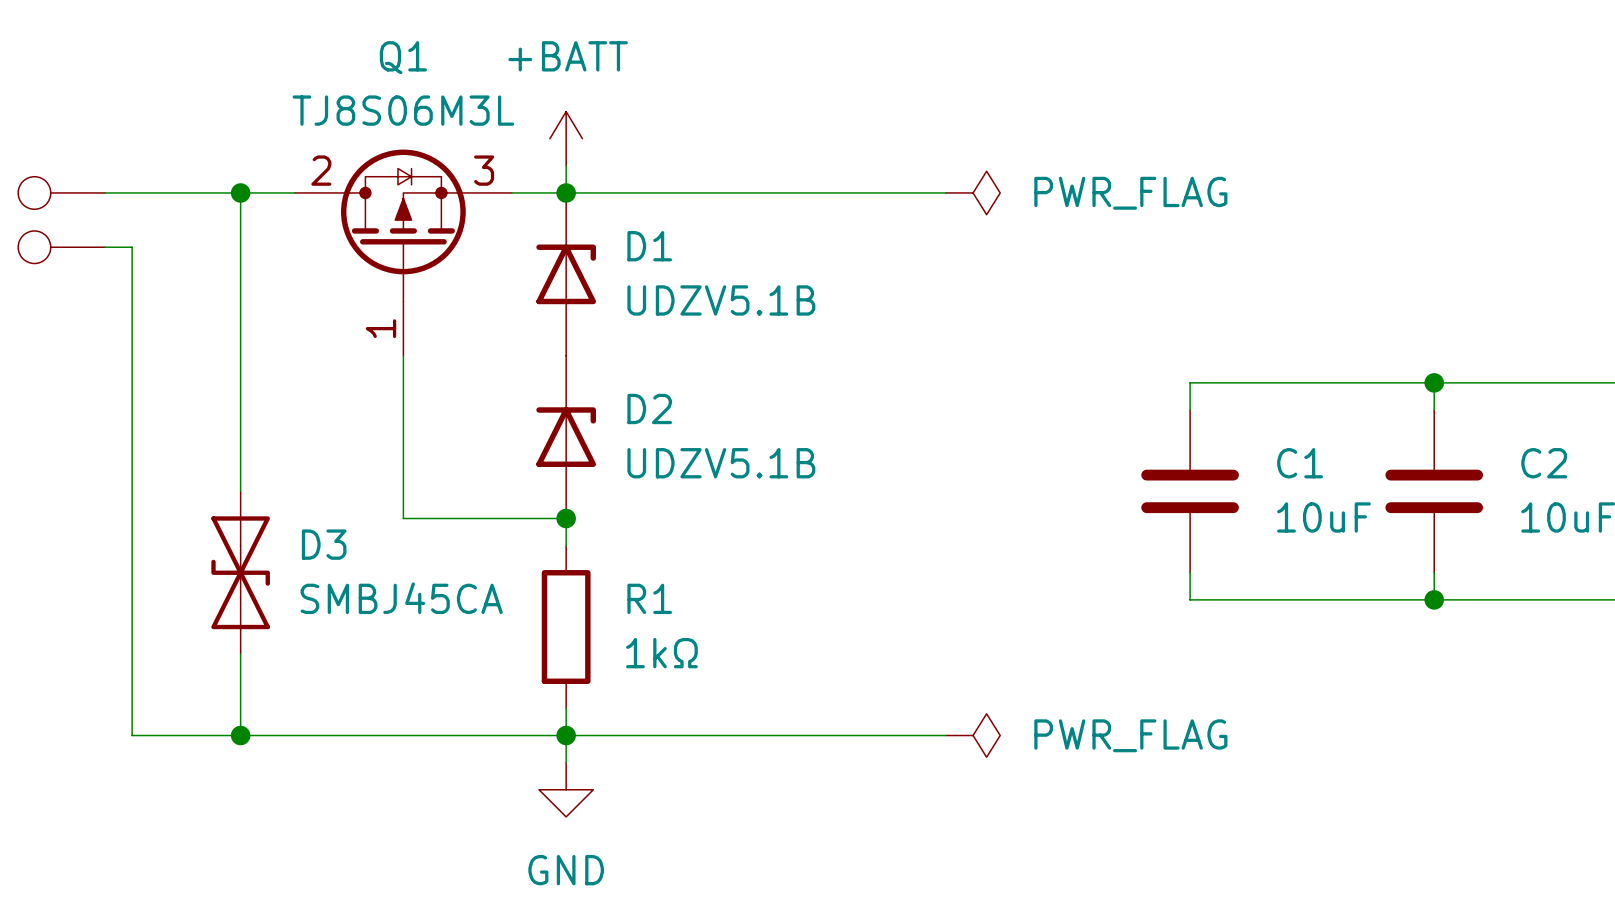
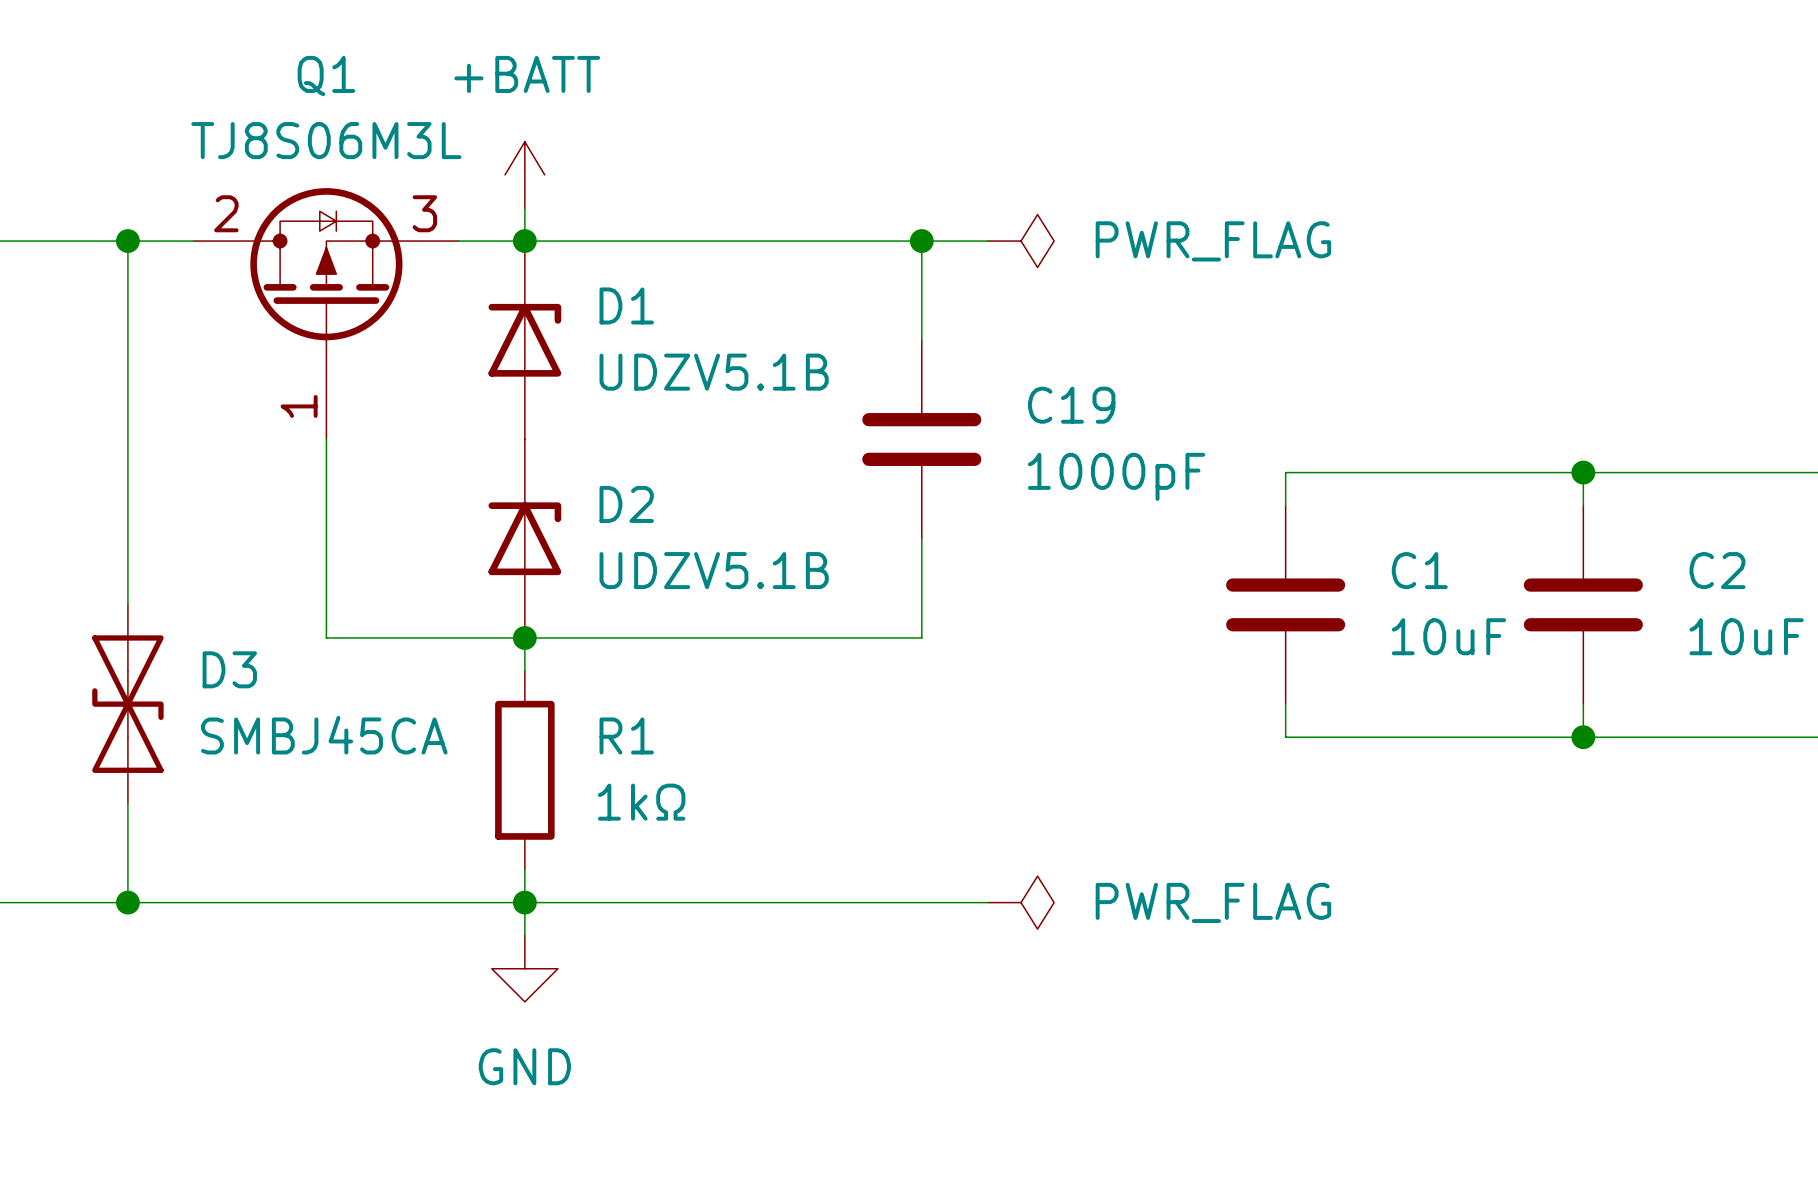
wire: none -> (921, 241) (921, 340)
junction: none -> (921, 241)
C19: none -> 1000pF (921, 439)
wire: none -> (921, 538) (921, 637) (524, 637)

